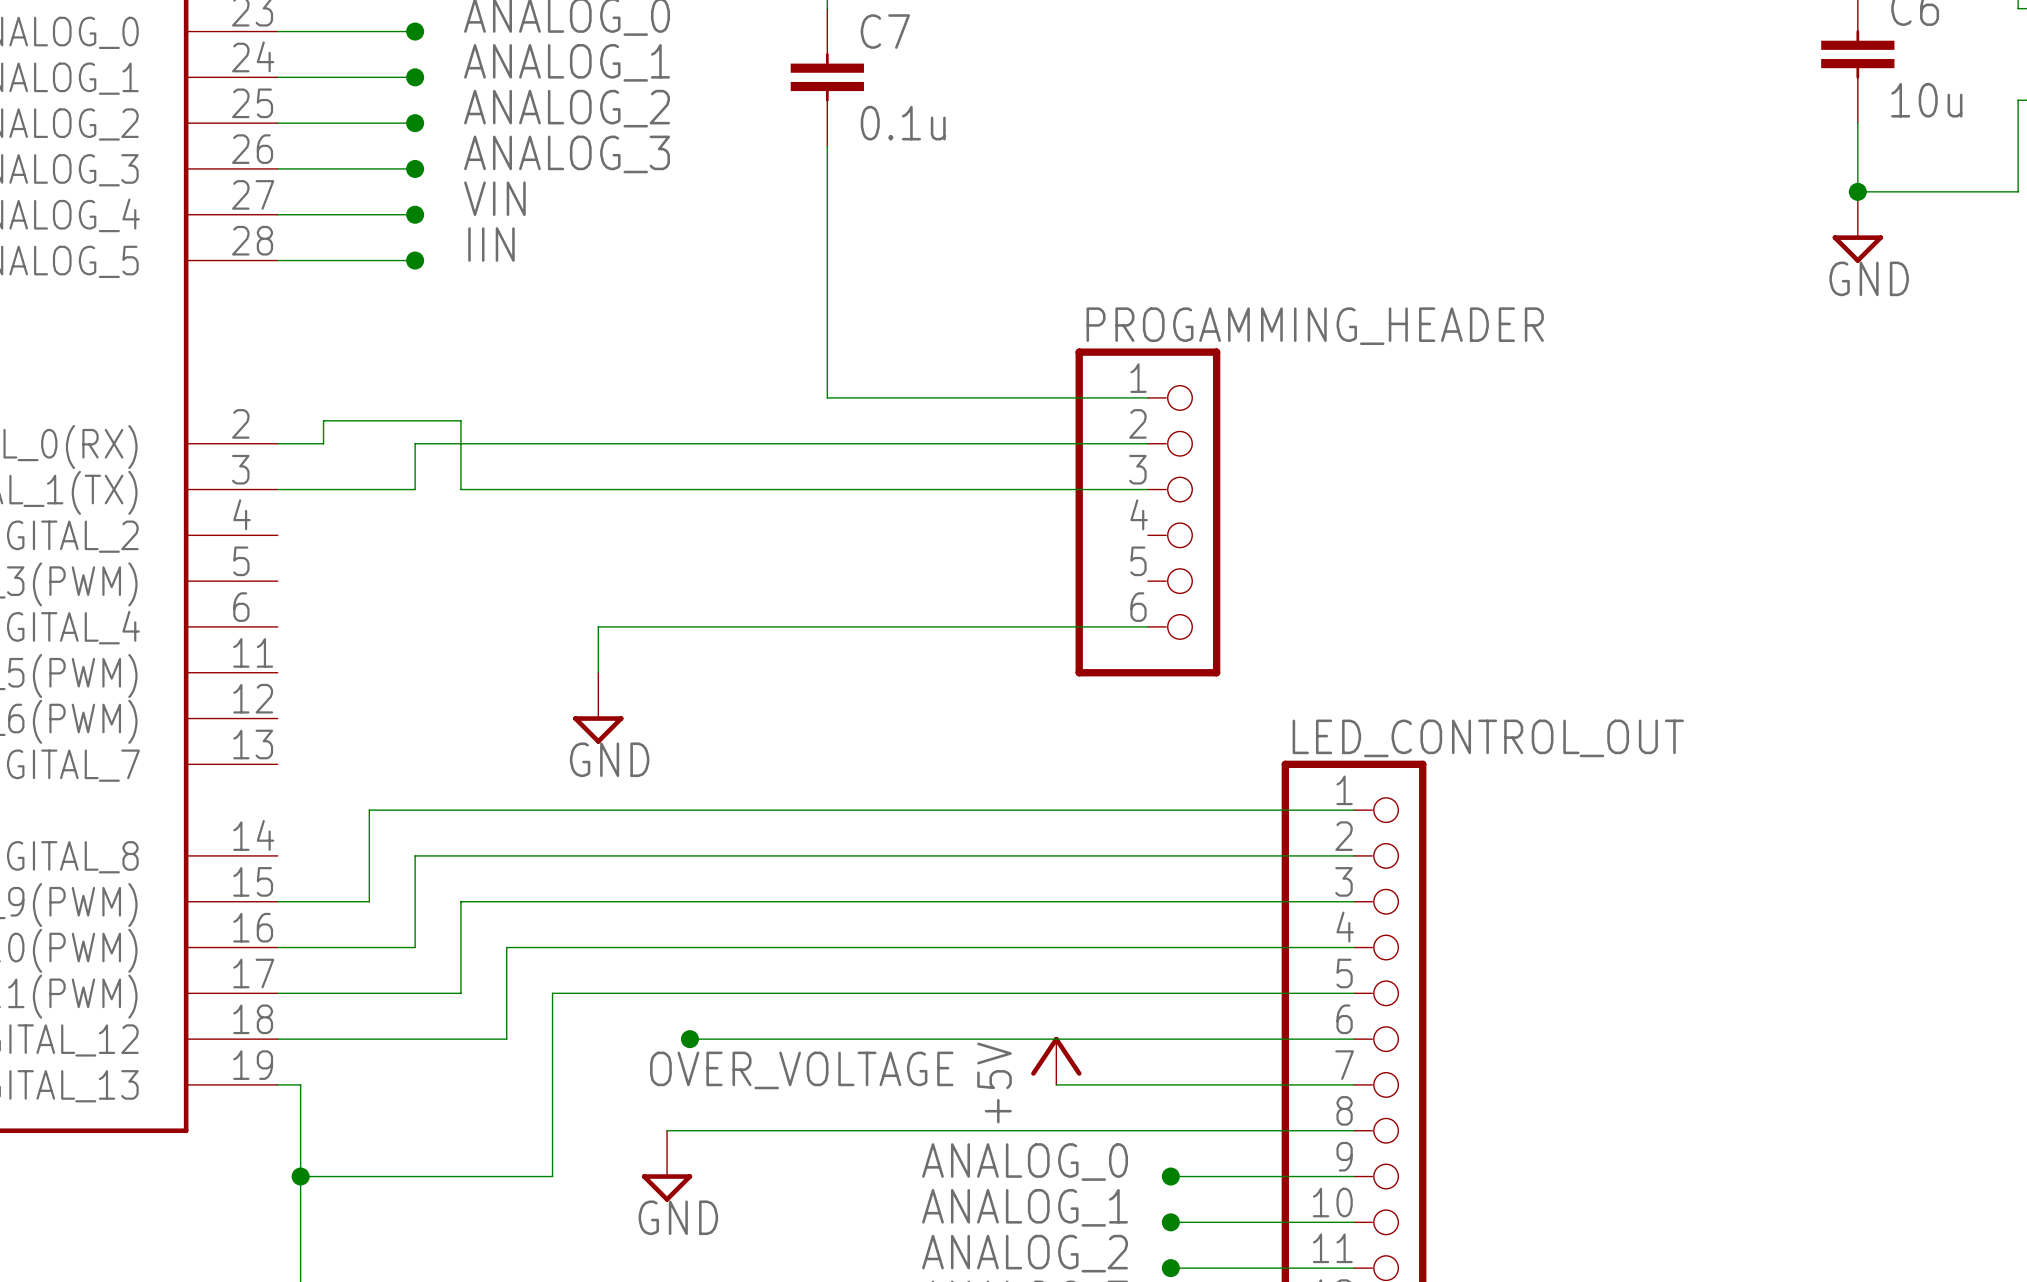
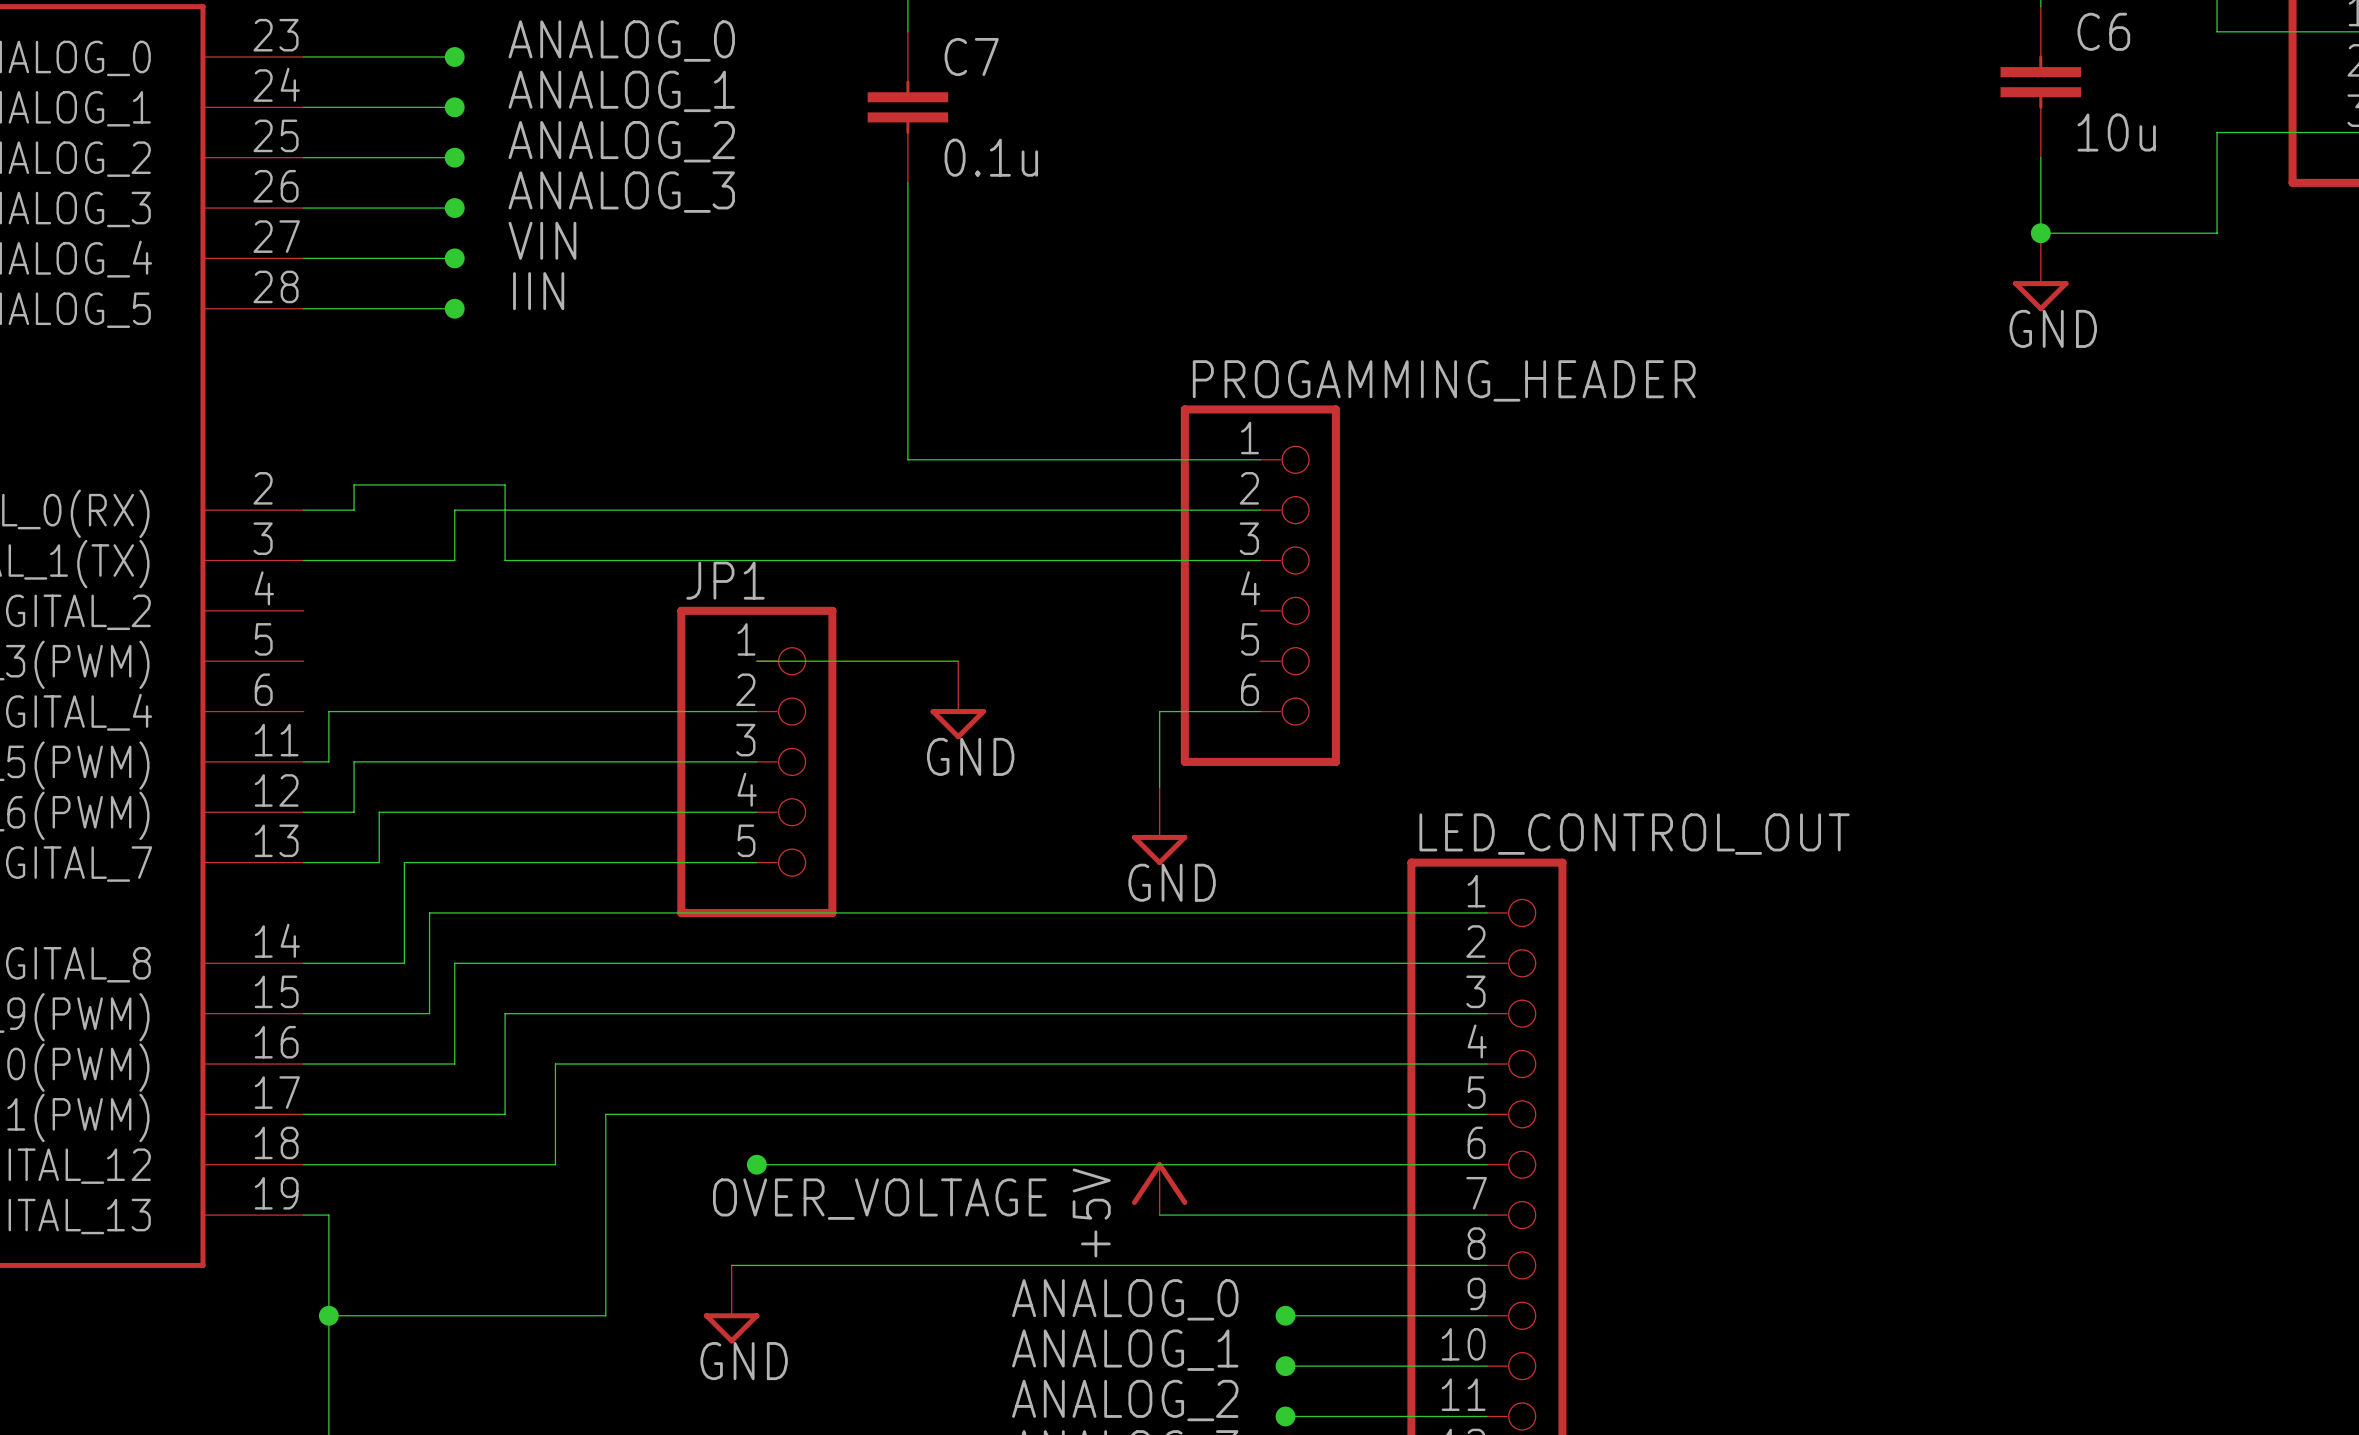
wire: none -> (756, 661) (958, 661)
power symbol: none -> GND (958, 700)
wire: (598, 626) (598, 672) -> (656, 711) (328, 711) (328, 761) (303, 761)
wire: (689, 626) (1056, 626) -> (1159, 787) (1159, 711)
wire: none -> (756, 761) (354, 761) (354, 812) (303, 812)
JP1: none -> (756, 761)
power symbol: GND (598, 708) -> none
wire: none -> (756, 812) (379, 812) (379, 862) (303, 862)
power symbol: none -> GND (1159, 826)
wire: (369, 810) (392, 810) -> (404, 912) (404, 862) (756, 862)
wire: none -> (303, 963) (404, 963)
wire: (369, 855) (369, 901) -> (429, 912) (429, 1013) (404, 1013)

